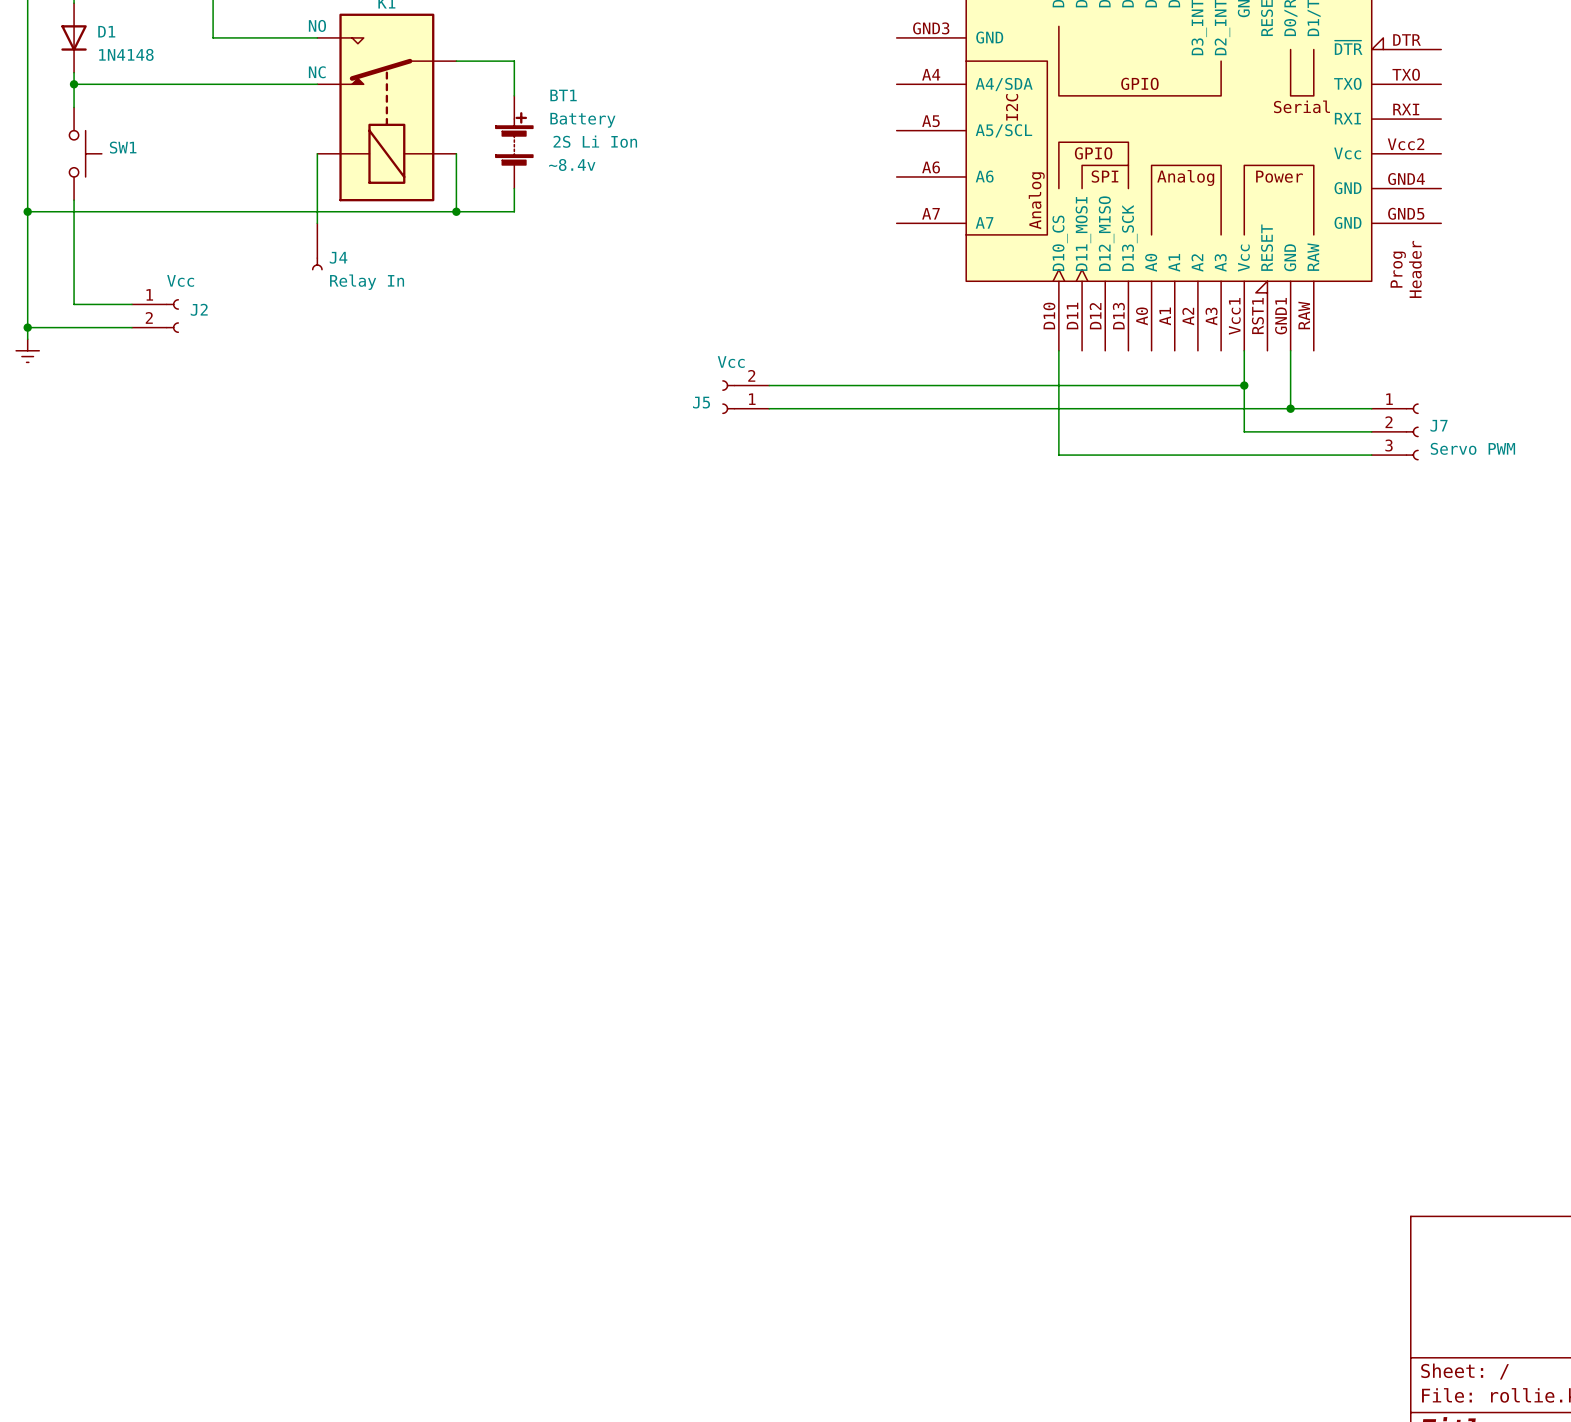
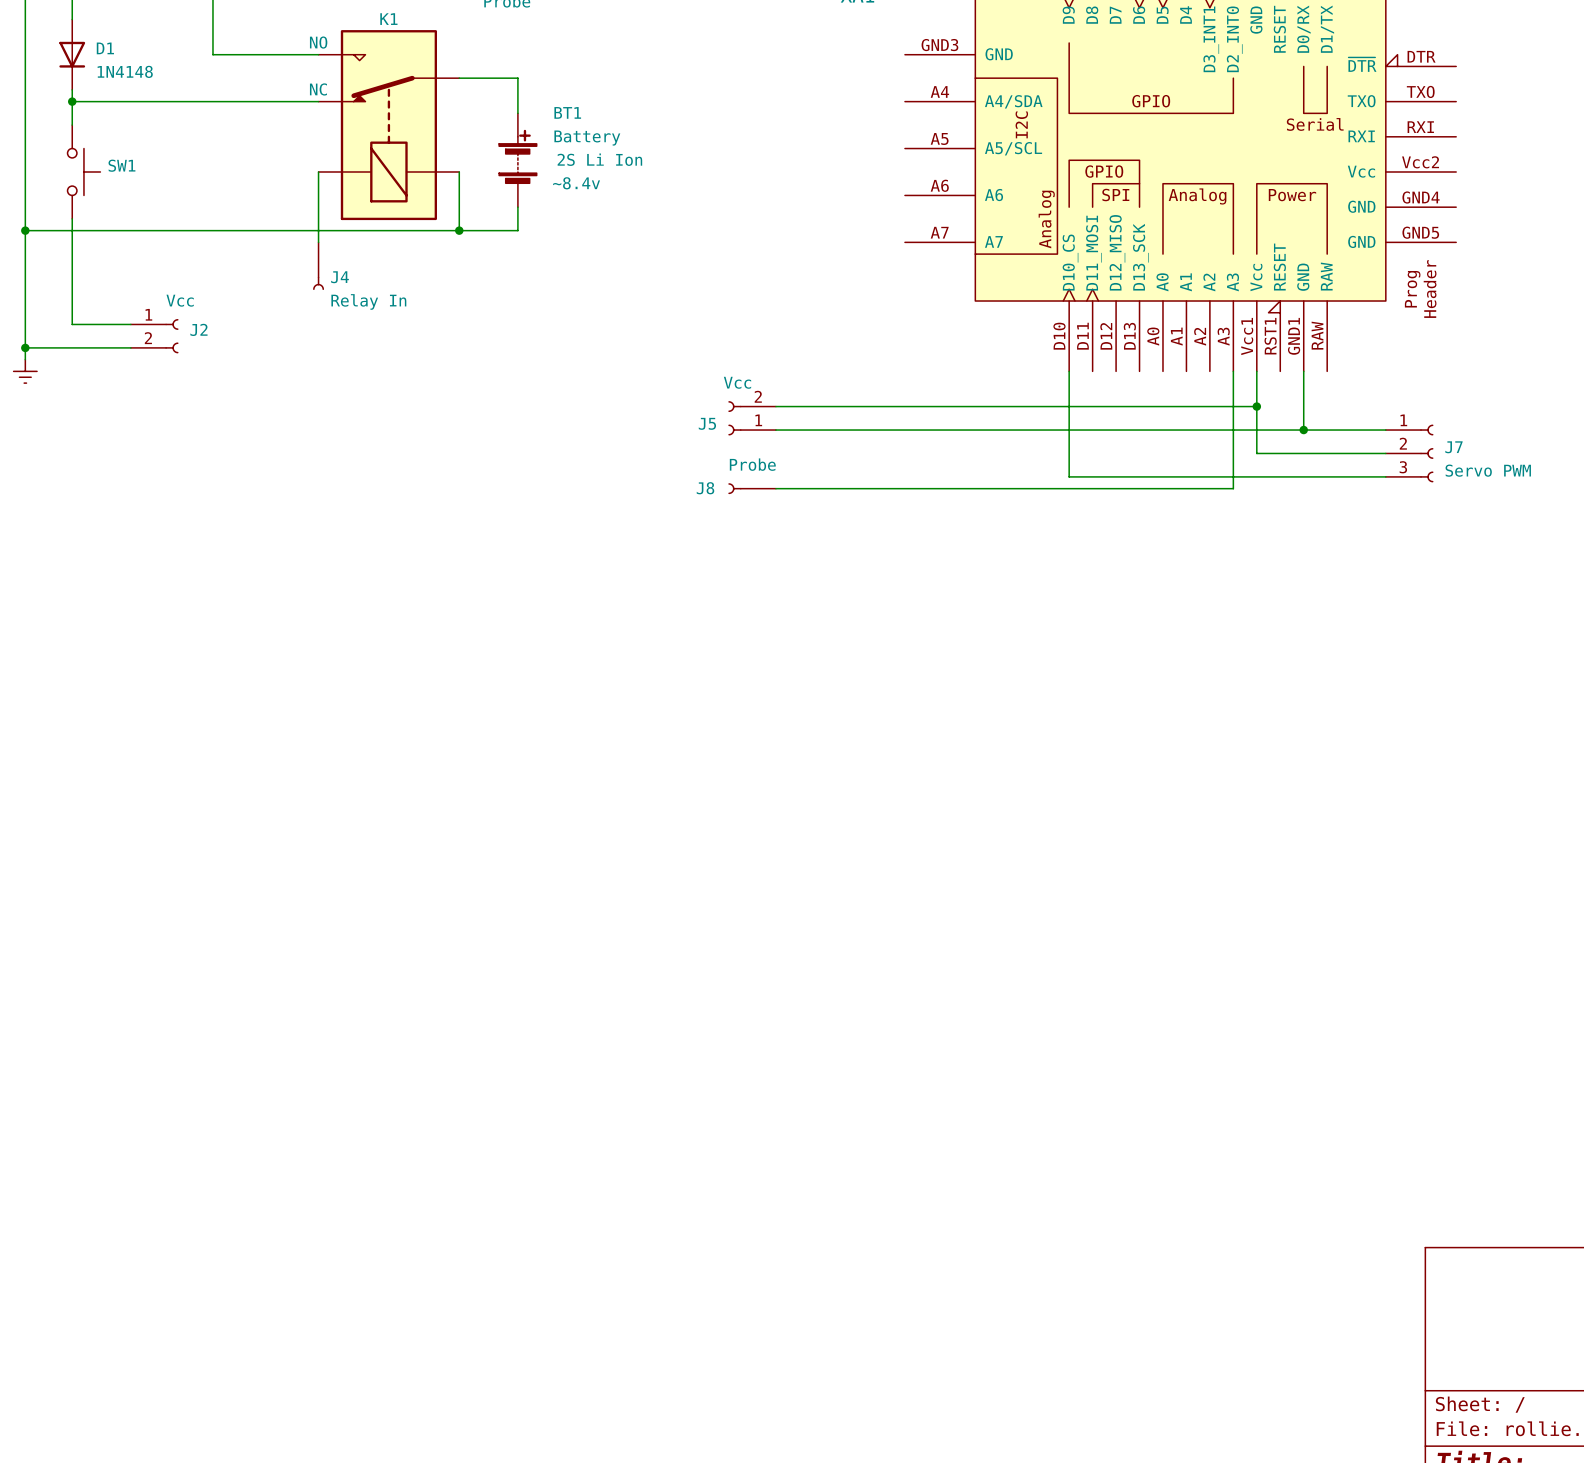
wire: none -> (1233, 371) (1233, 488) (775, 488)
J8: none -> Probe (752, 488)

